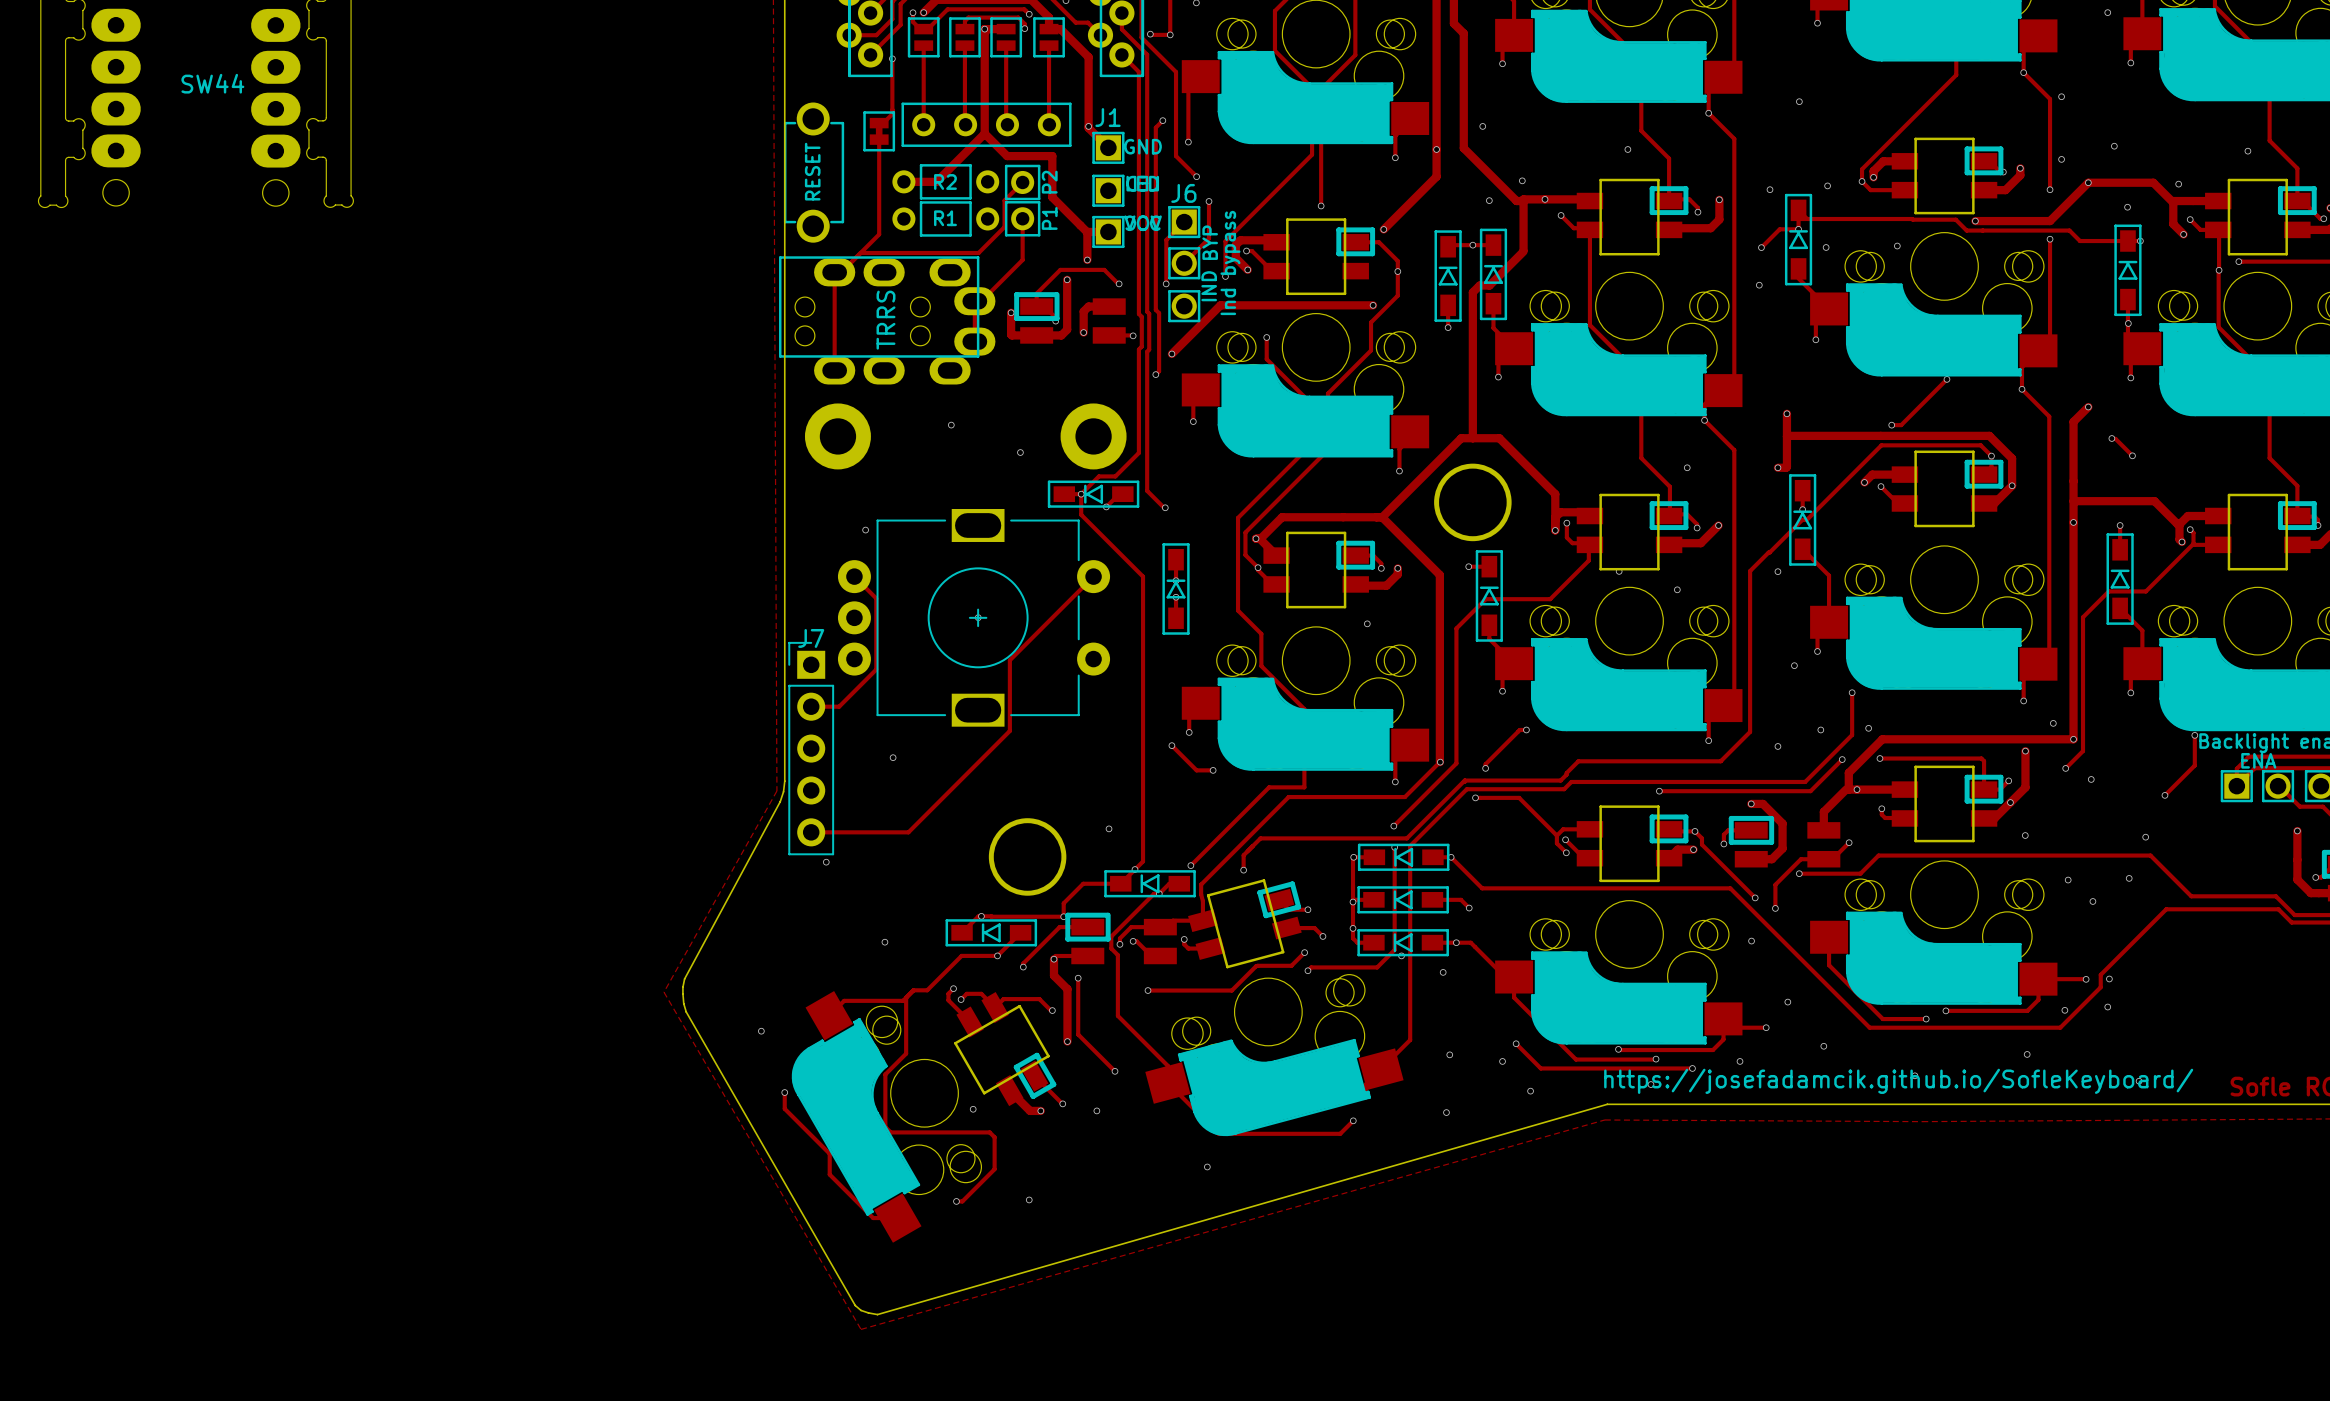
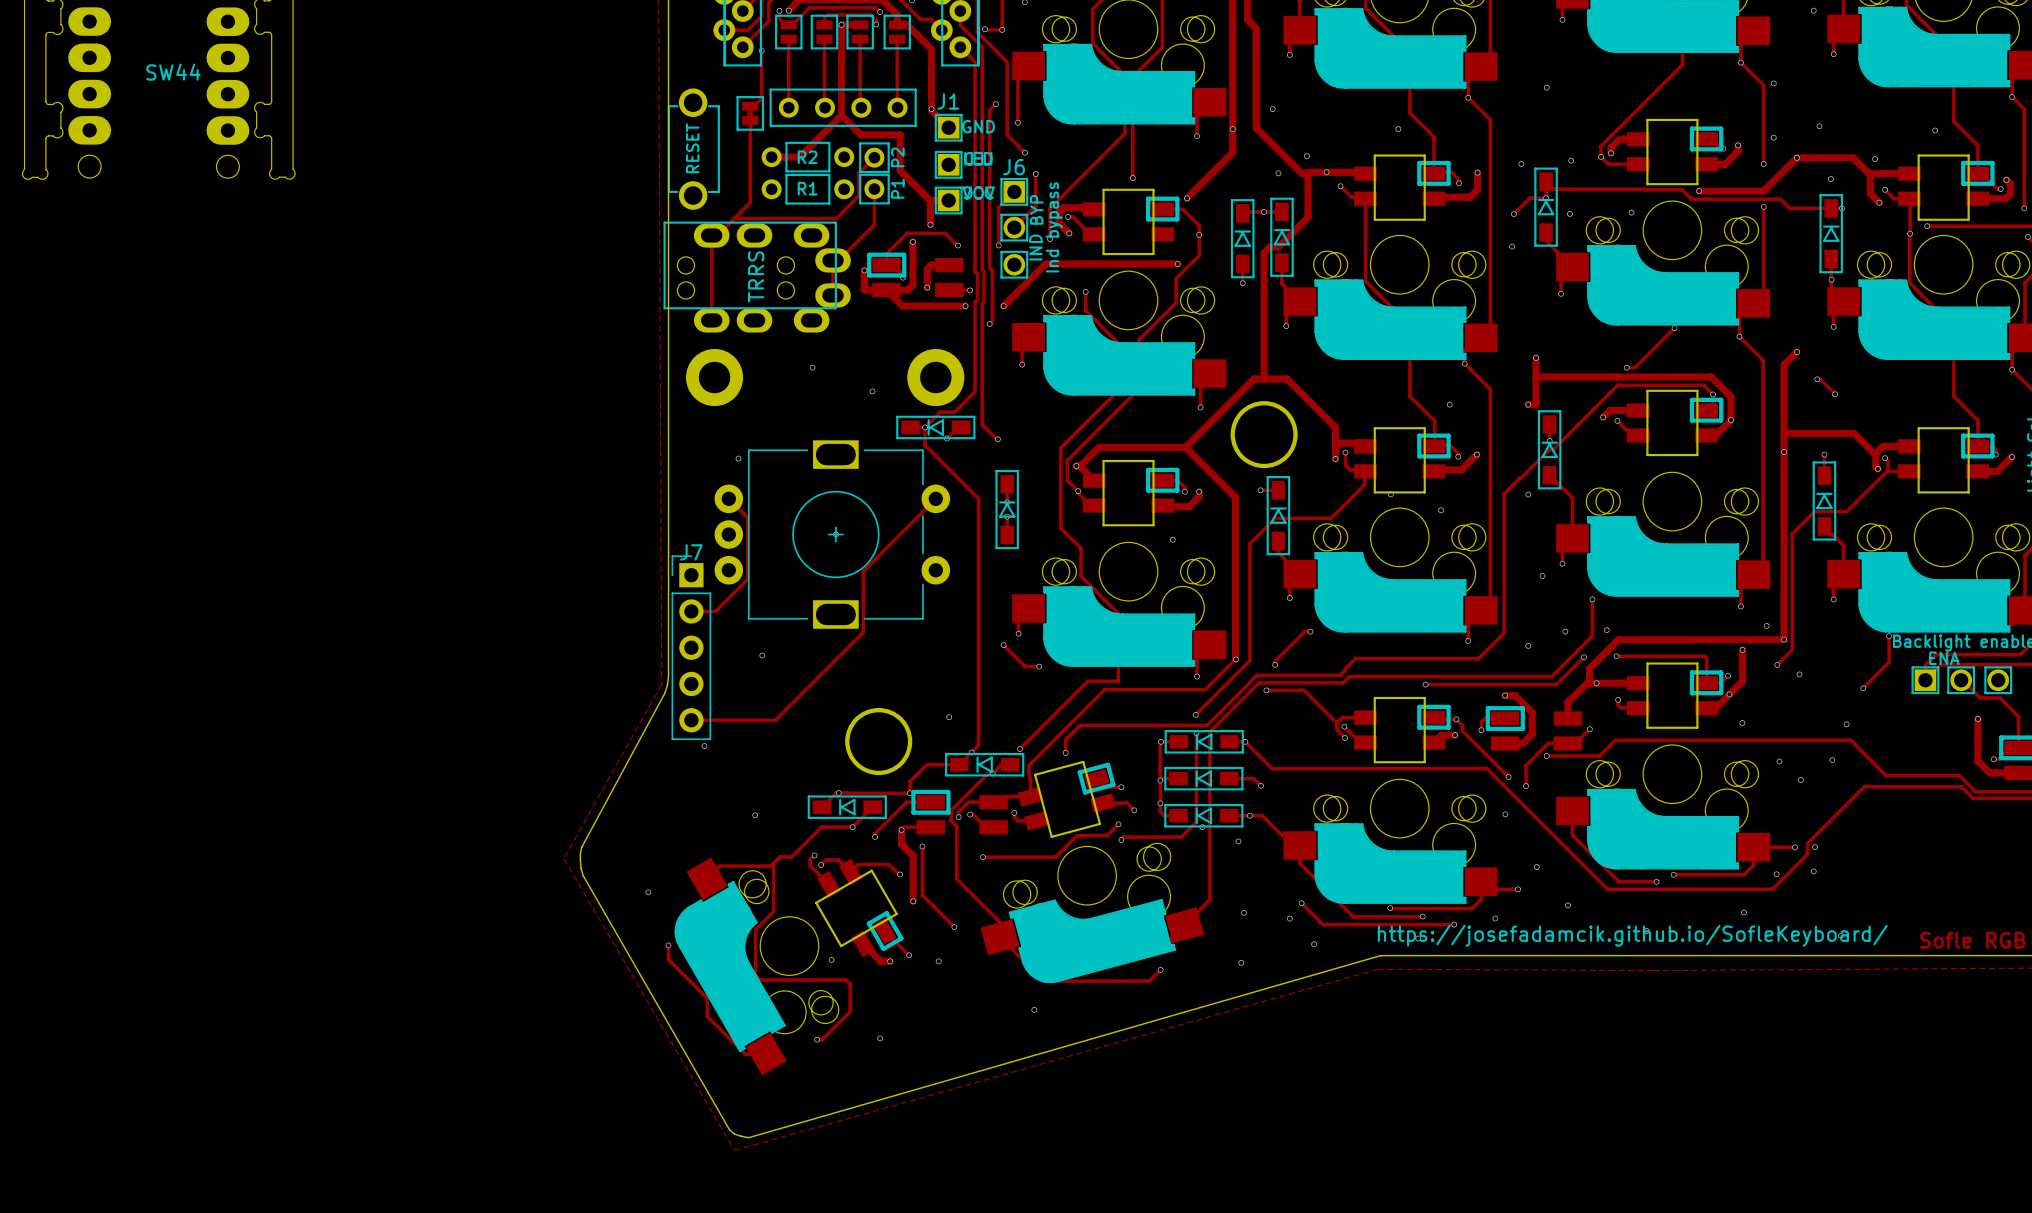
track: none -> (886, 290) (902, 306) (965, 306)
via: none -> (965, 306)

